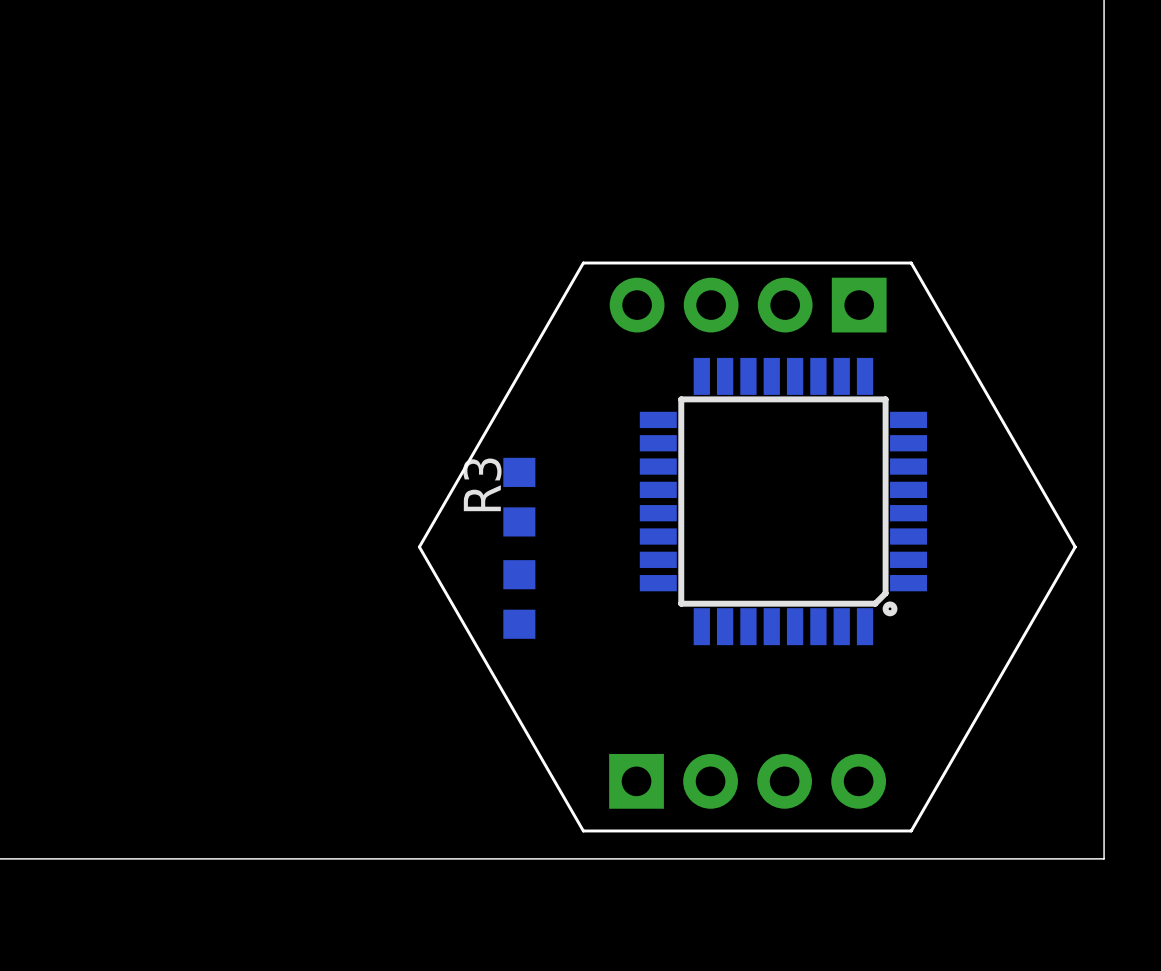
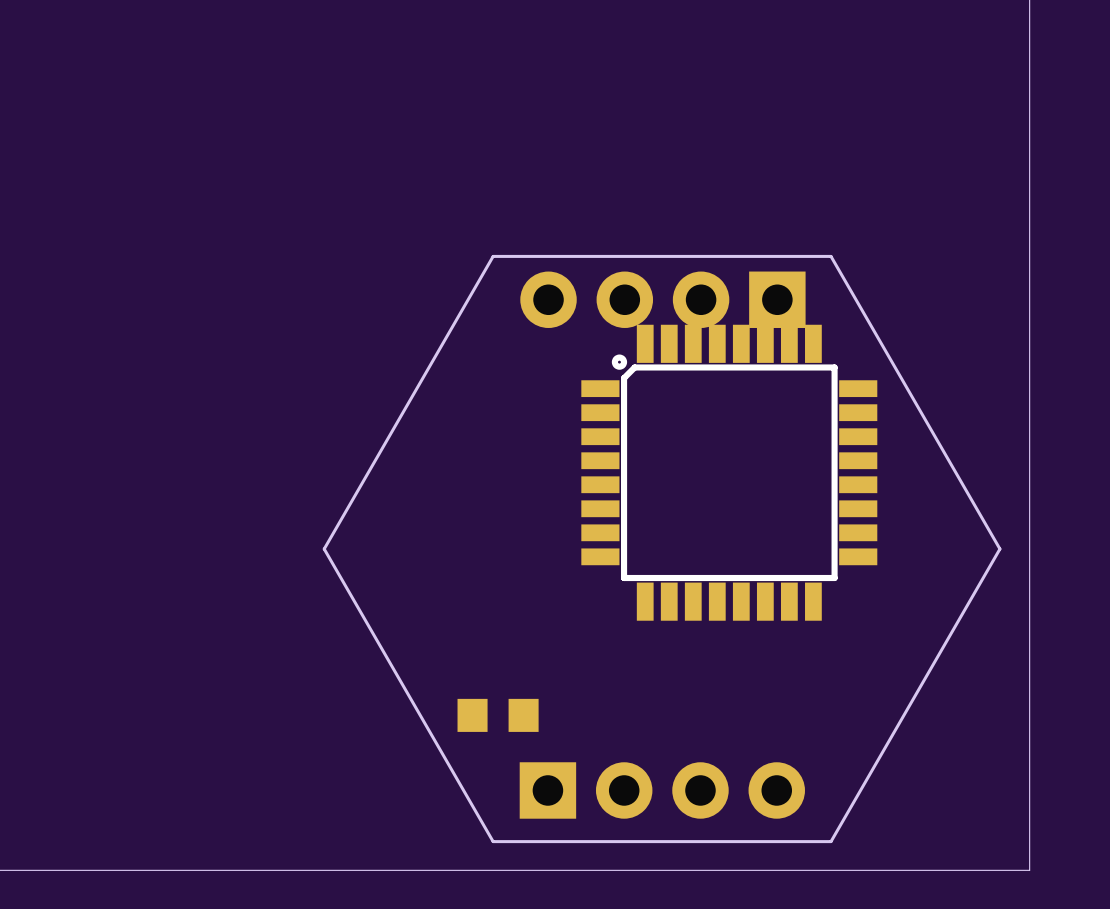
R3: (519, 497) -> none
part rotation: 0° (783, 501) -> 180° (729, 472)
part rotation: 0° (519, 599) -> 90° clockwise (498, 715)
part position: (519, 599) -> (498, 715)

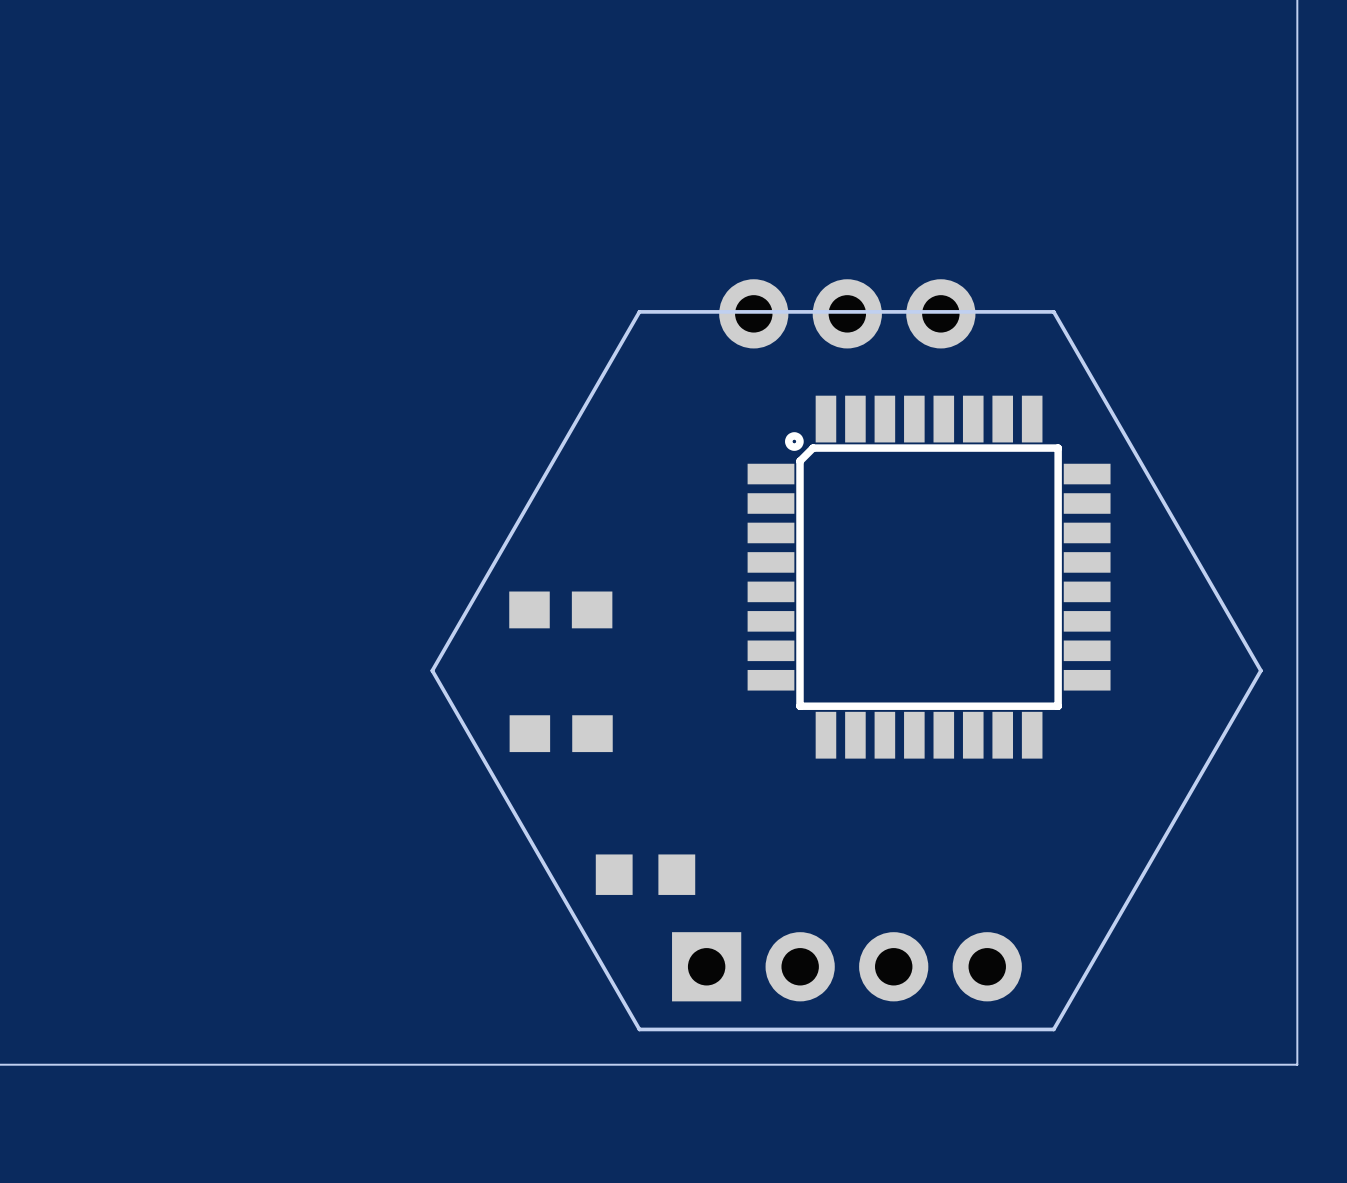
part: none -> (847, 313)
part: (662, 299) -> none
part: none -> (560, 609)
part: none -> (561, 733)

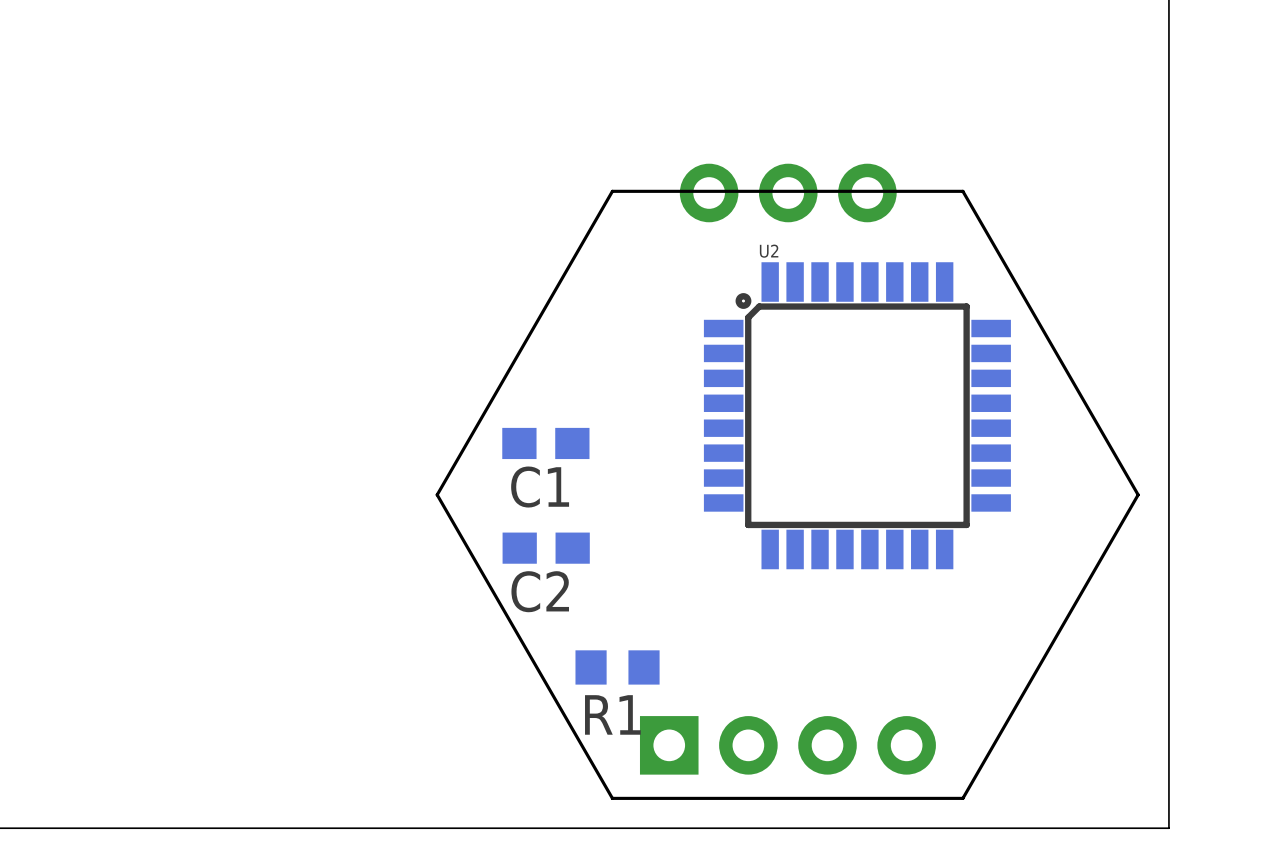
U2 name: none -> U2 (769, 251)
C1 name: none -> C1 (540, 487)
C2 name: none -> C2 (540, 591)
R1 name: none -> R1 (612, 714)

